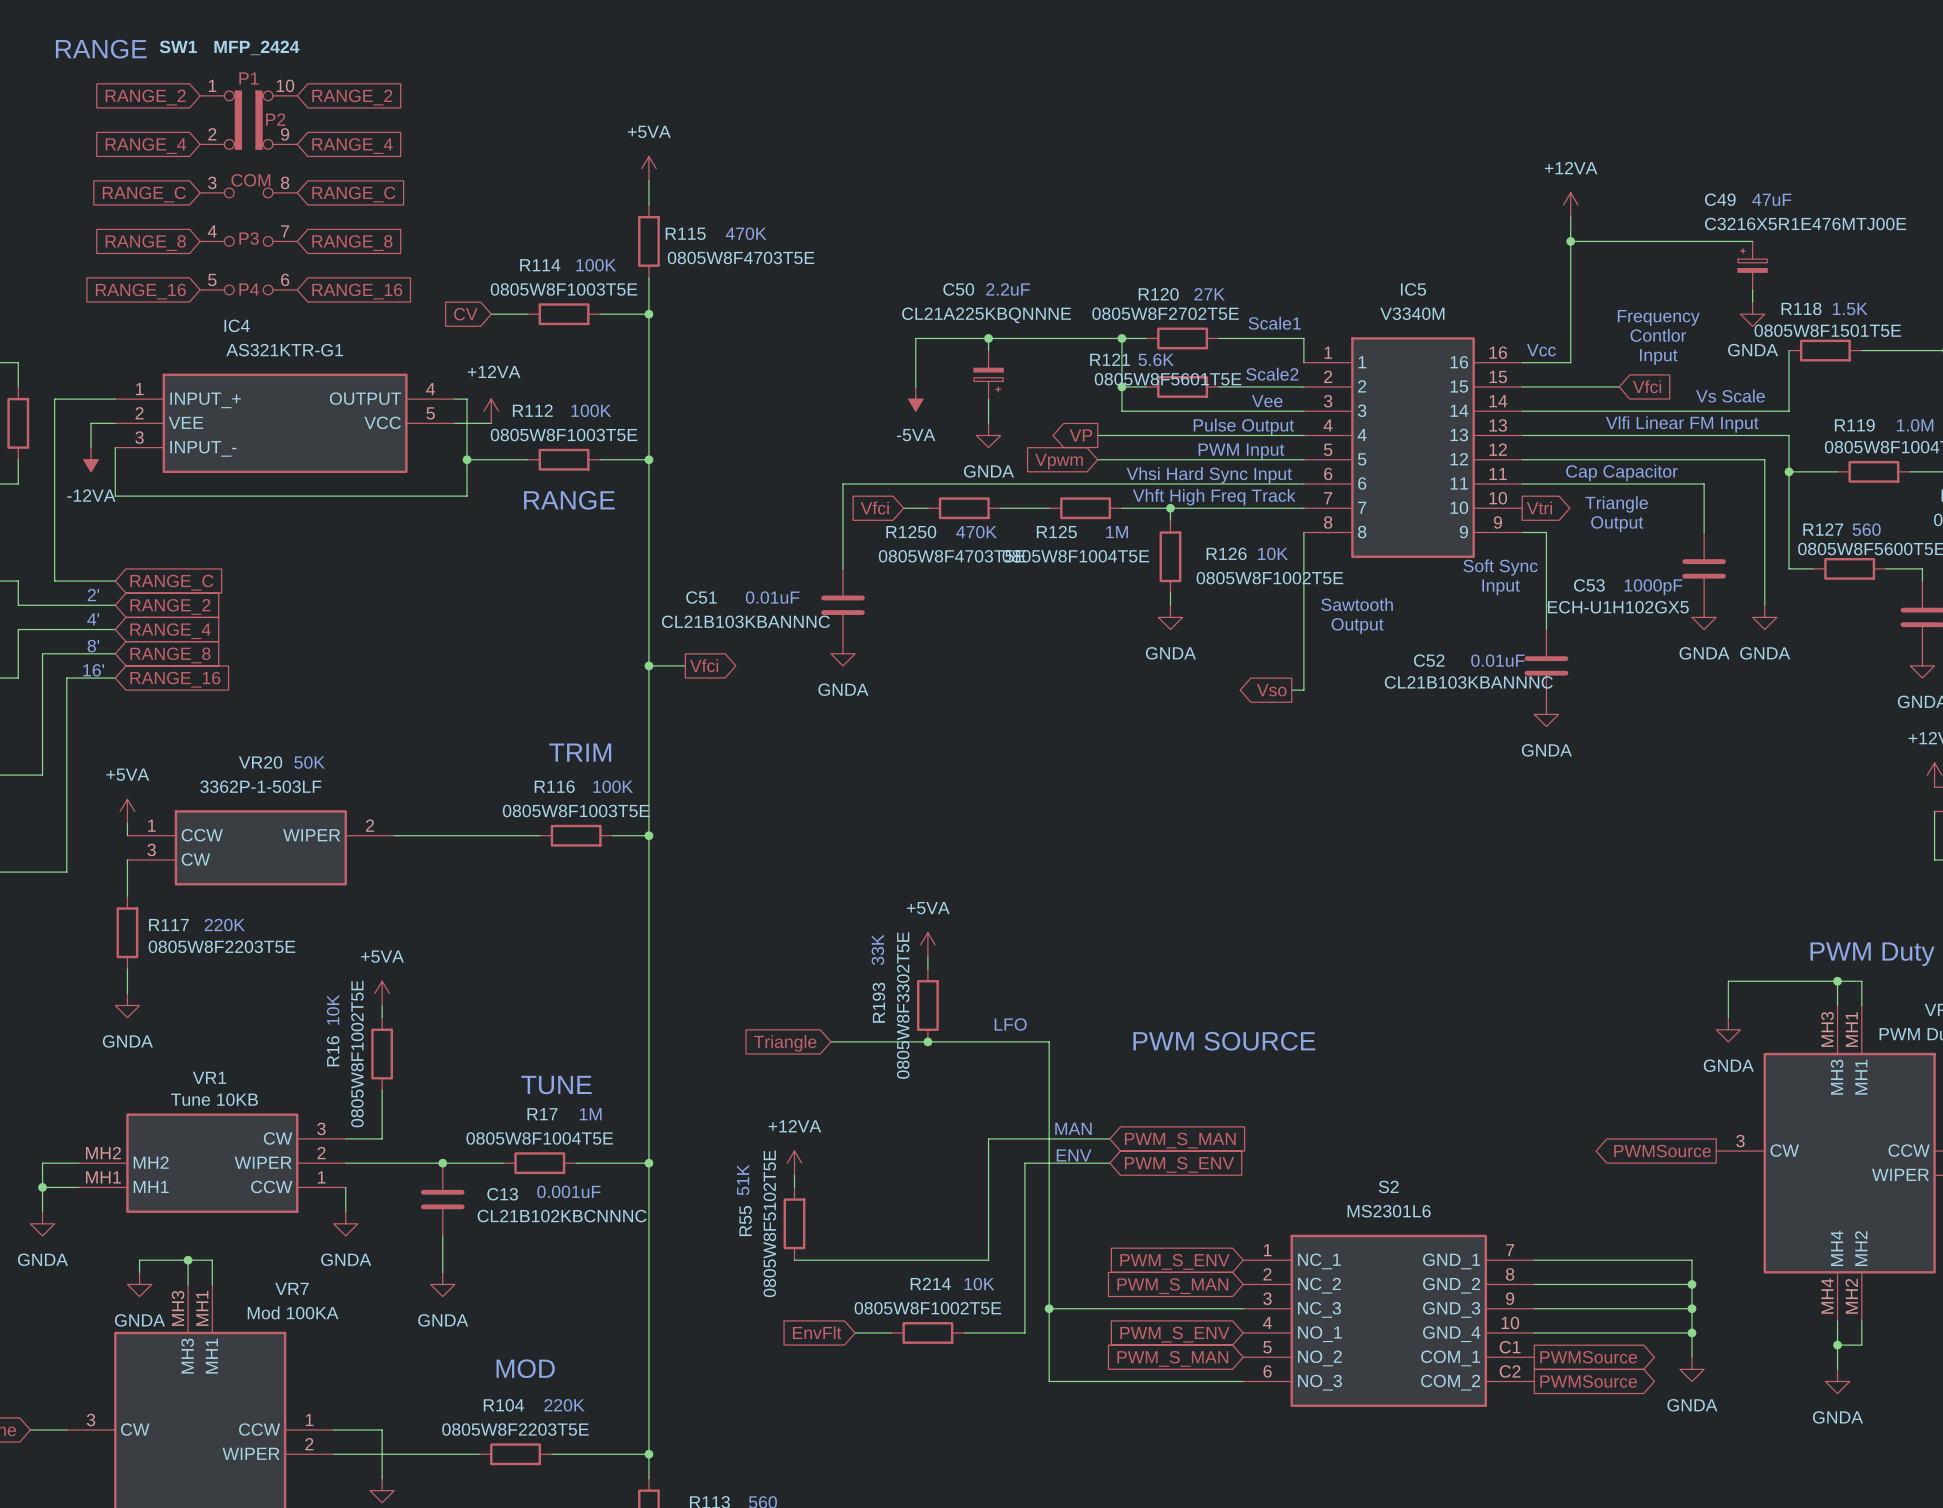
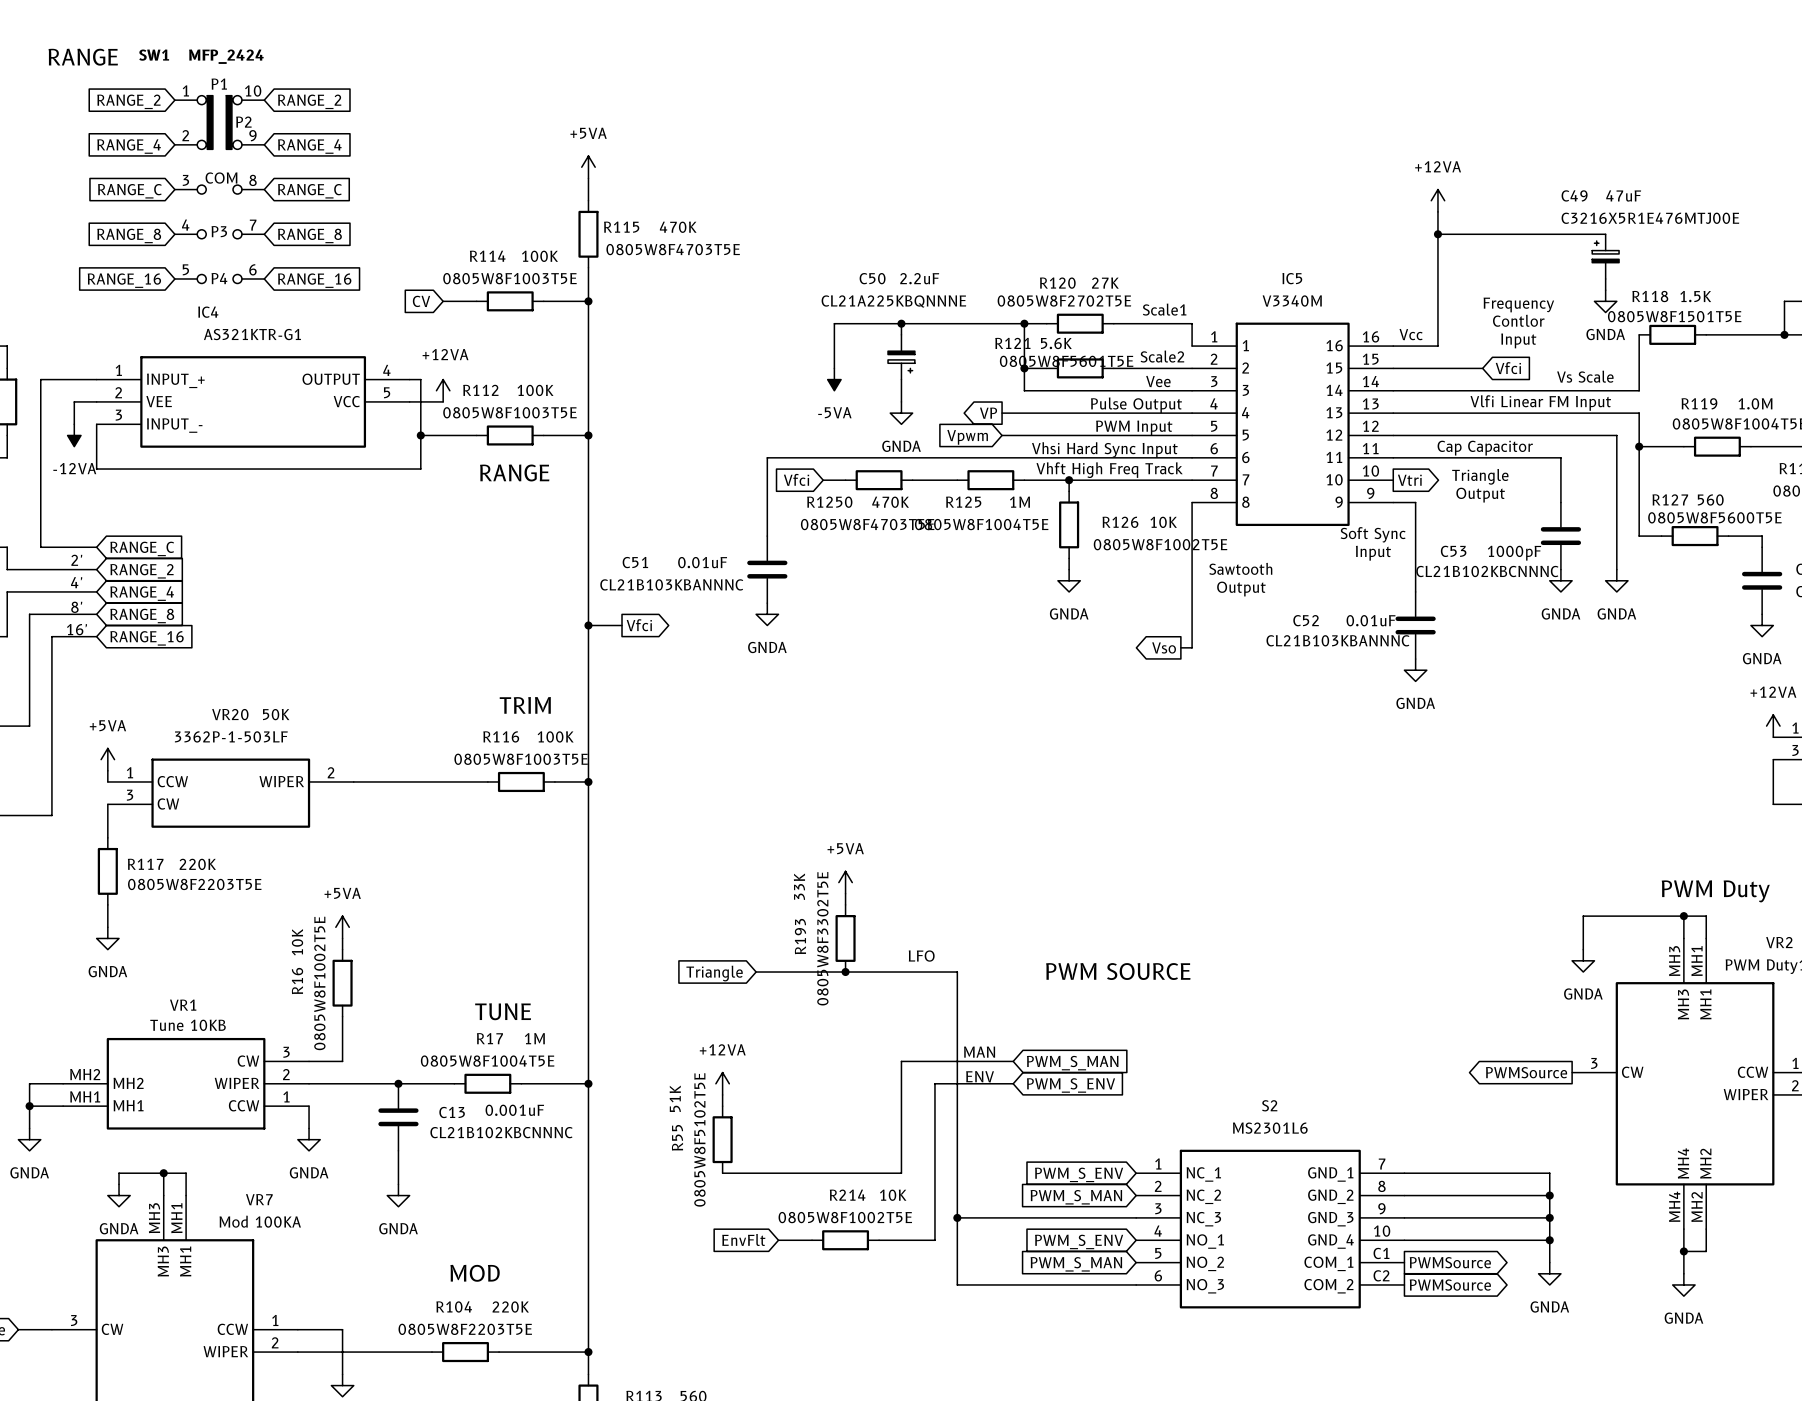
C53 value: ECH-U1H102GX5 (1618, 607) -> CL21B102KBCNNNC (1487, 571)

